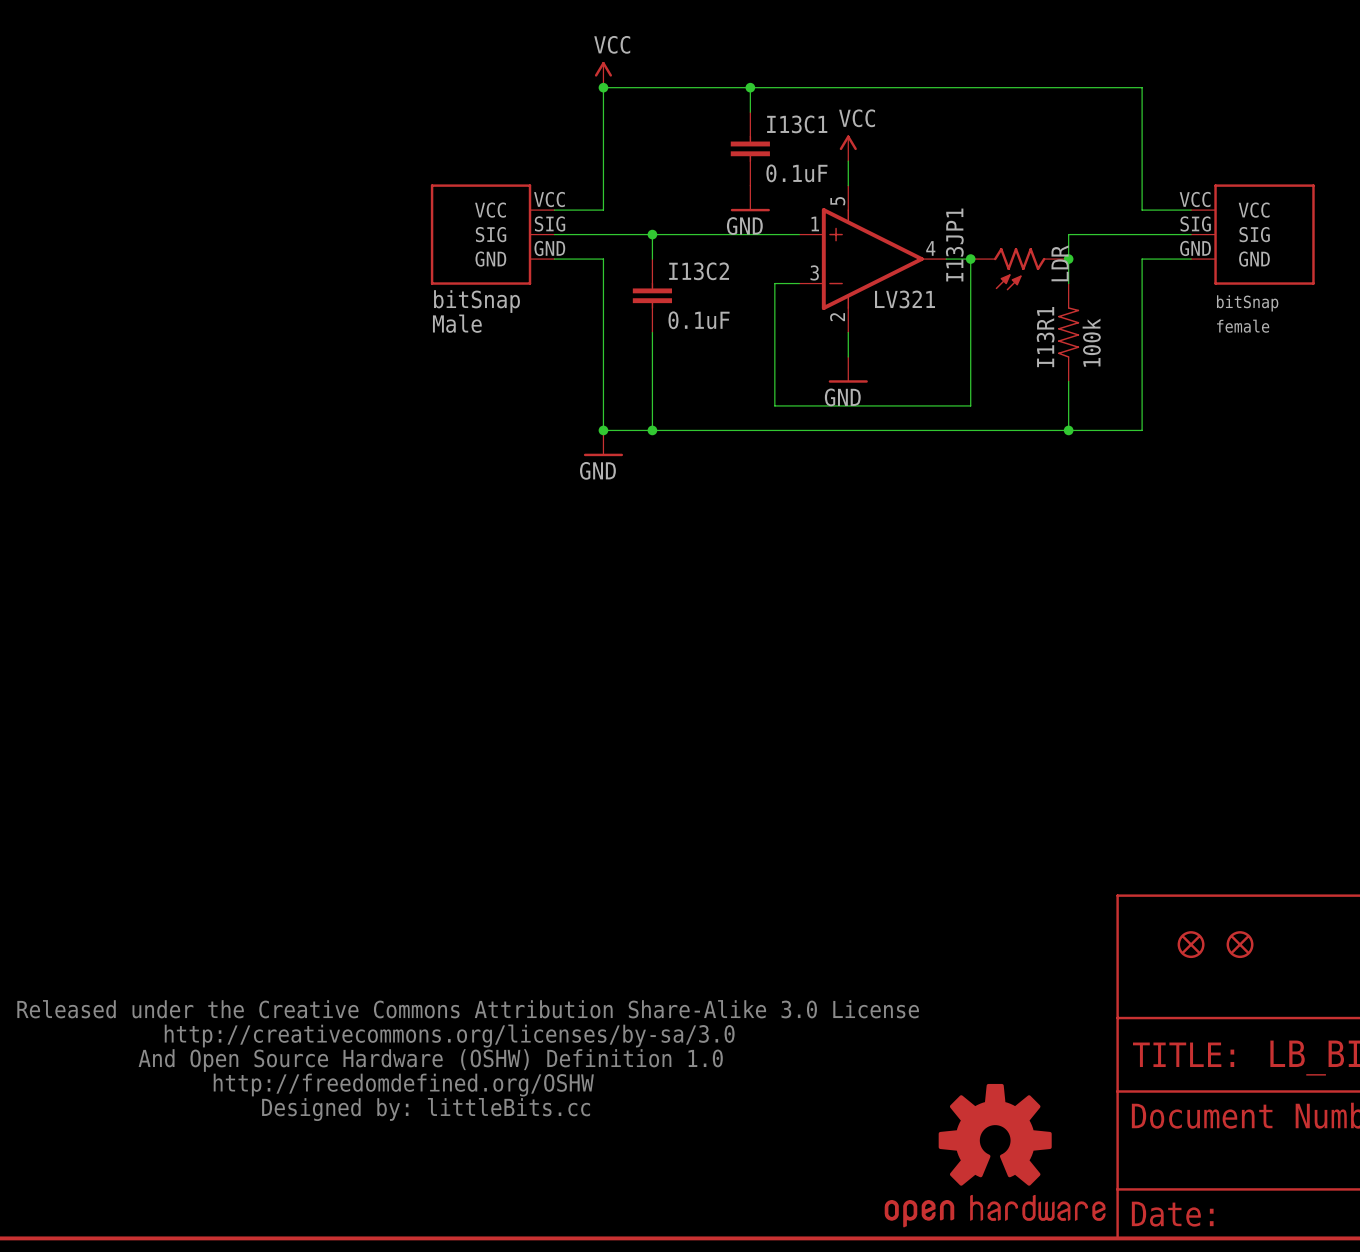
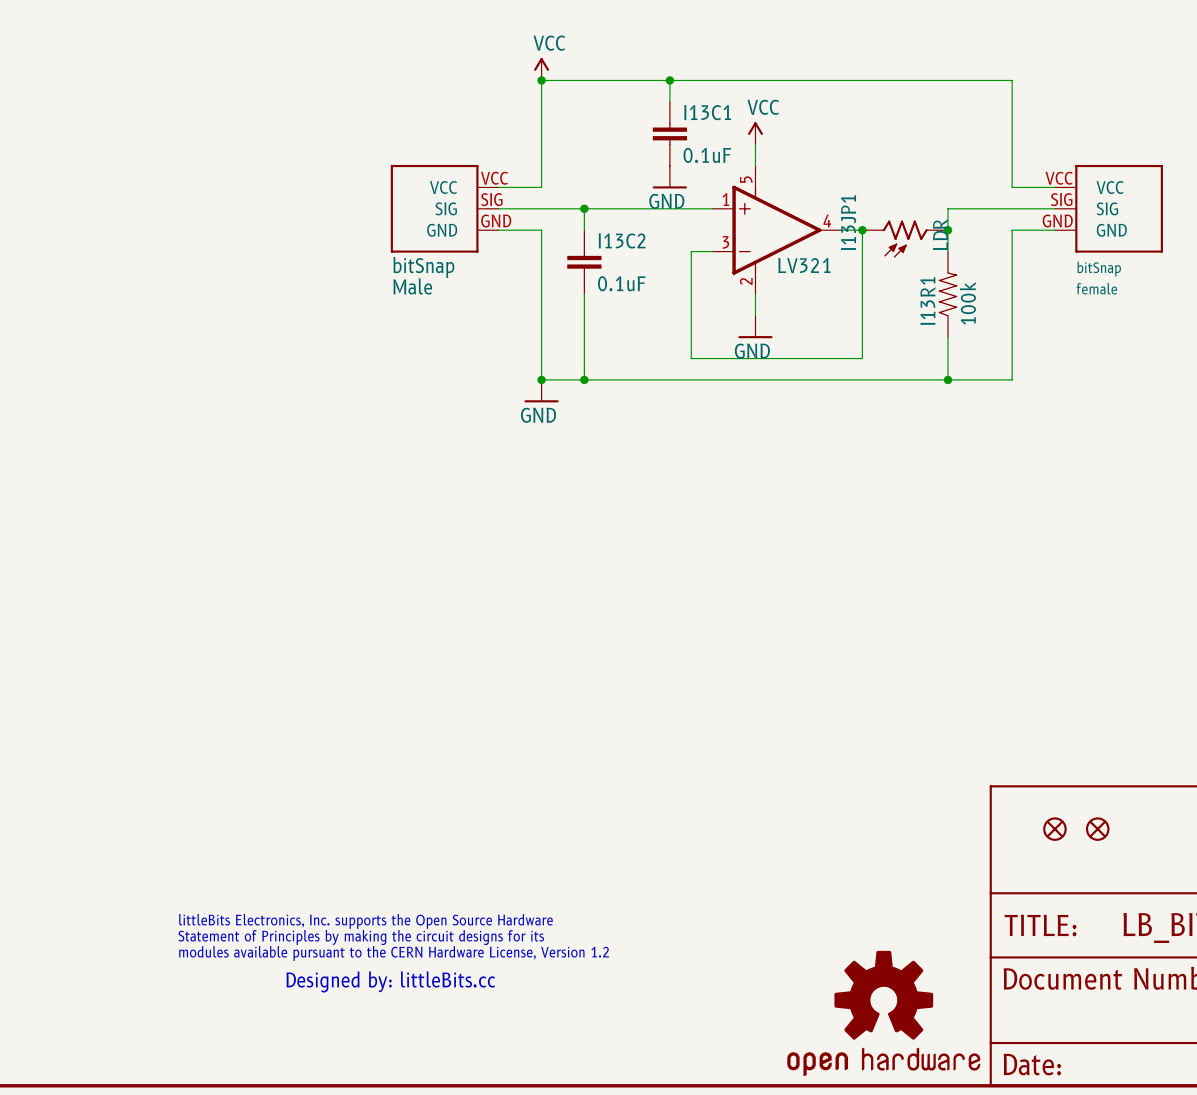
part: (468, 1060) -> none
part: none -> (393, 953)

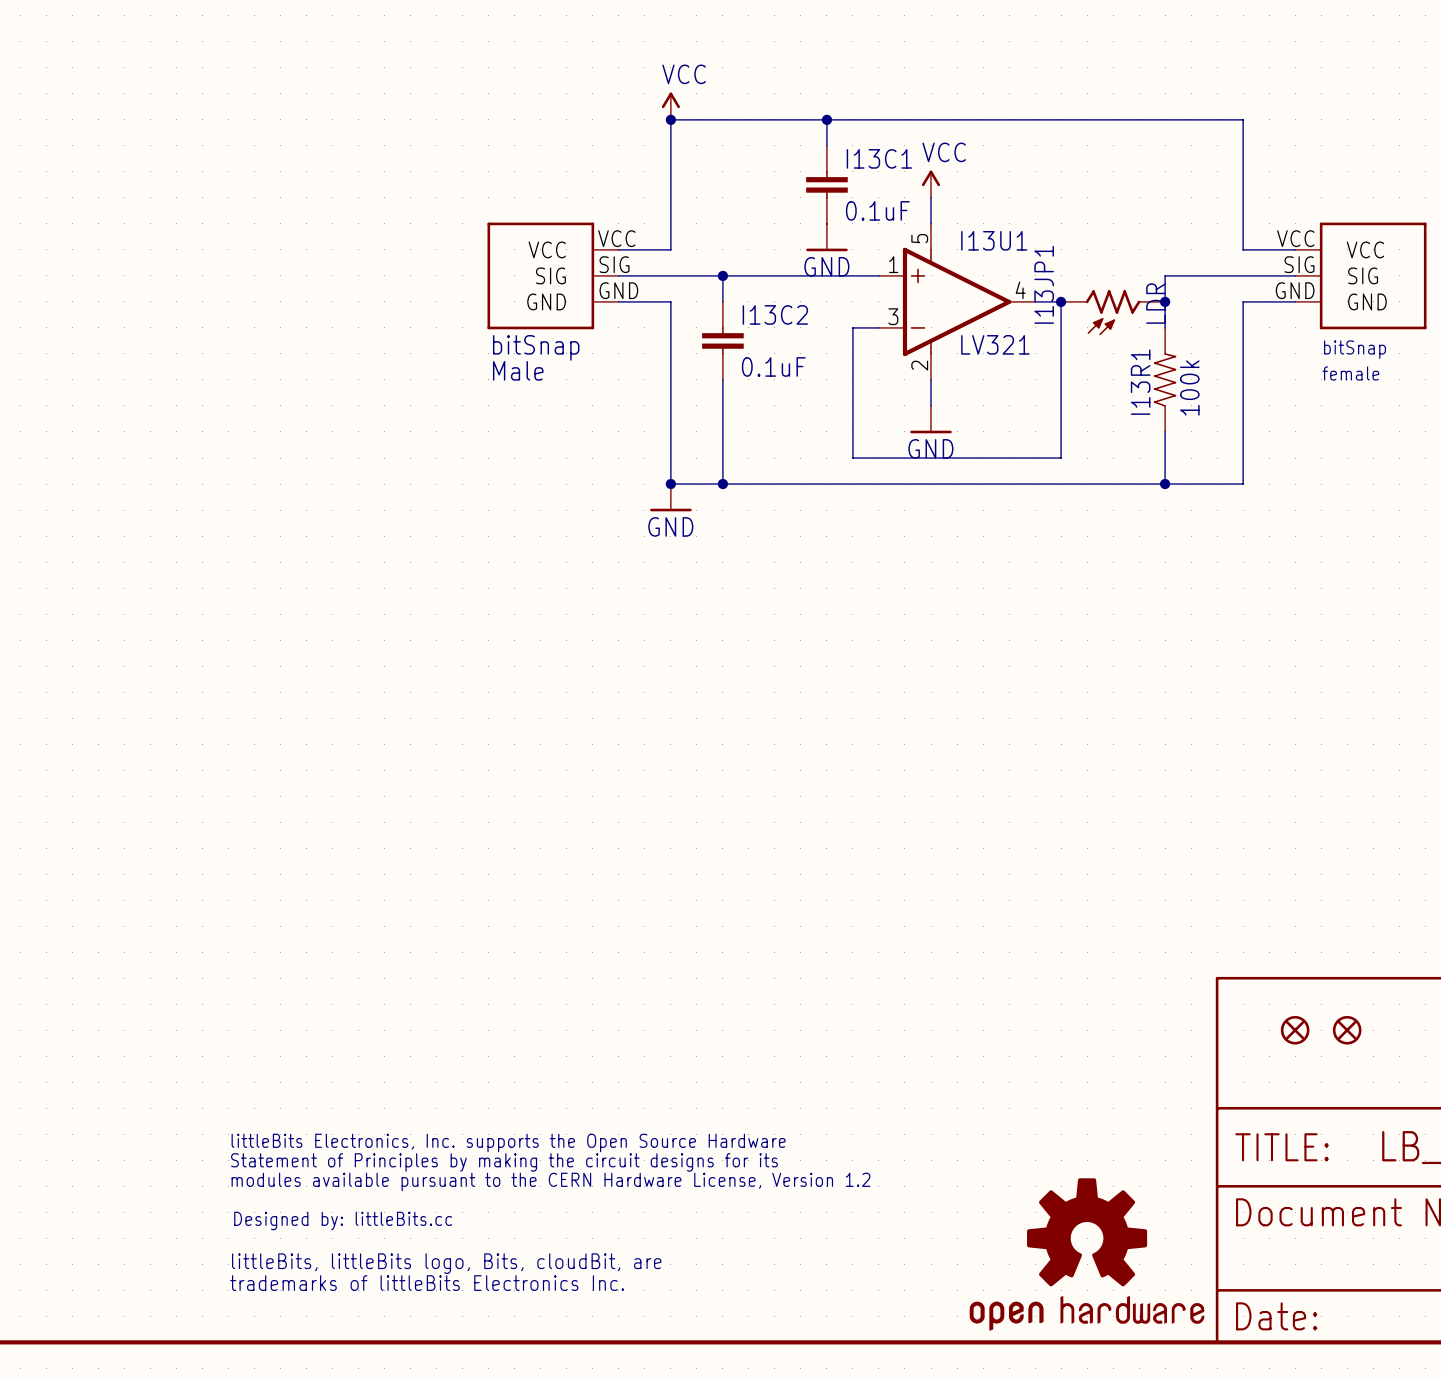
I13U1 name: none -> I13U1 (994, 240)
part: (393, 953) -> none
part: none -> (550, 1212)

